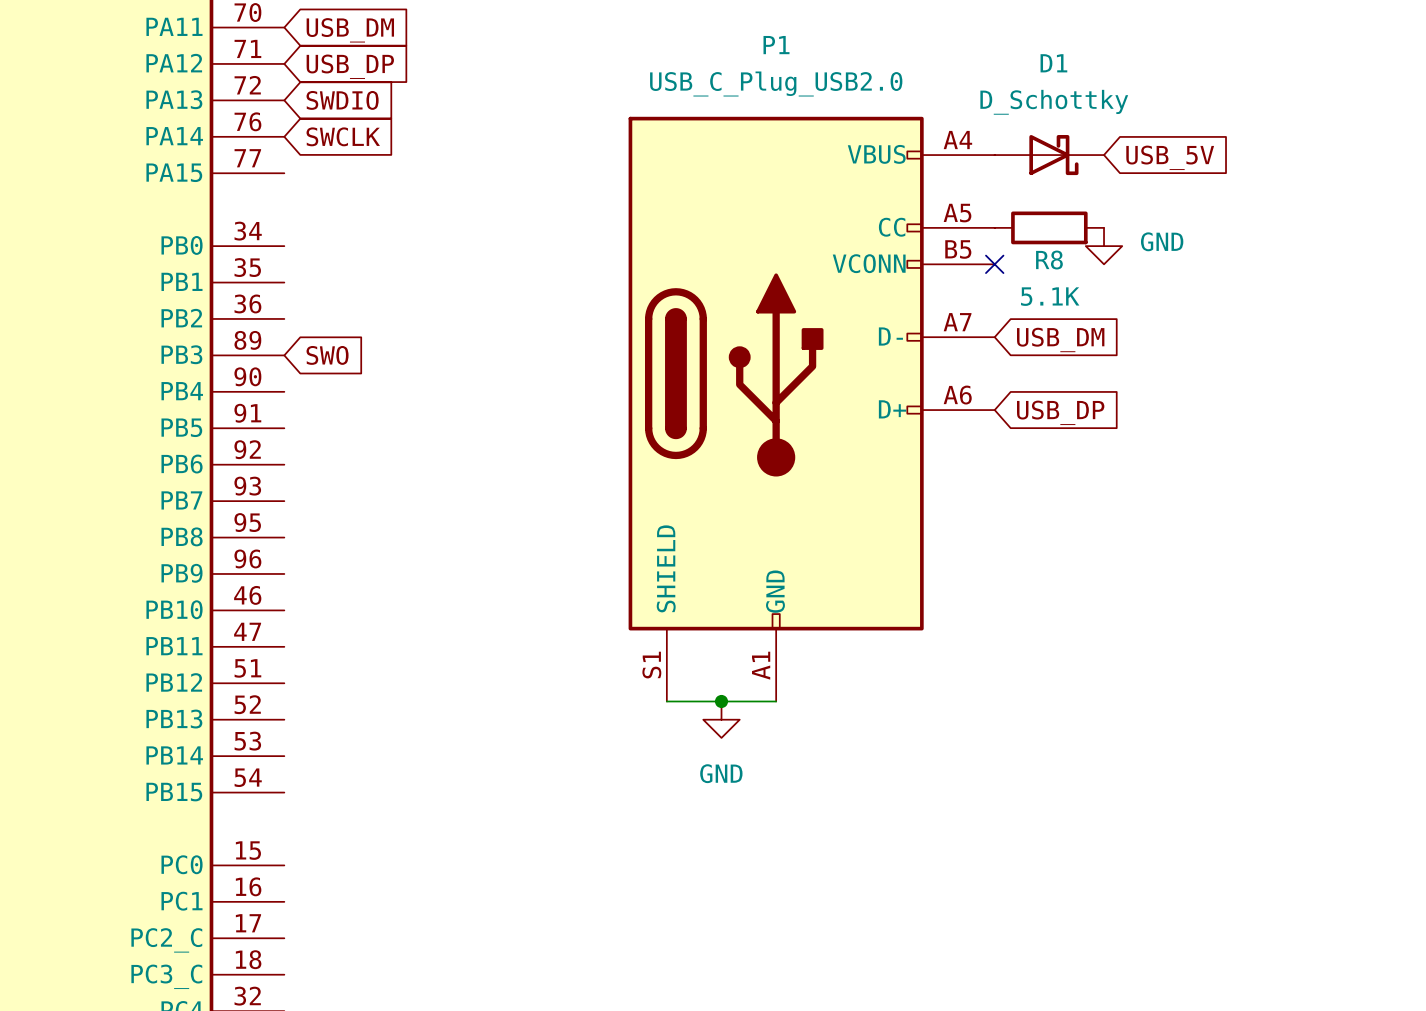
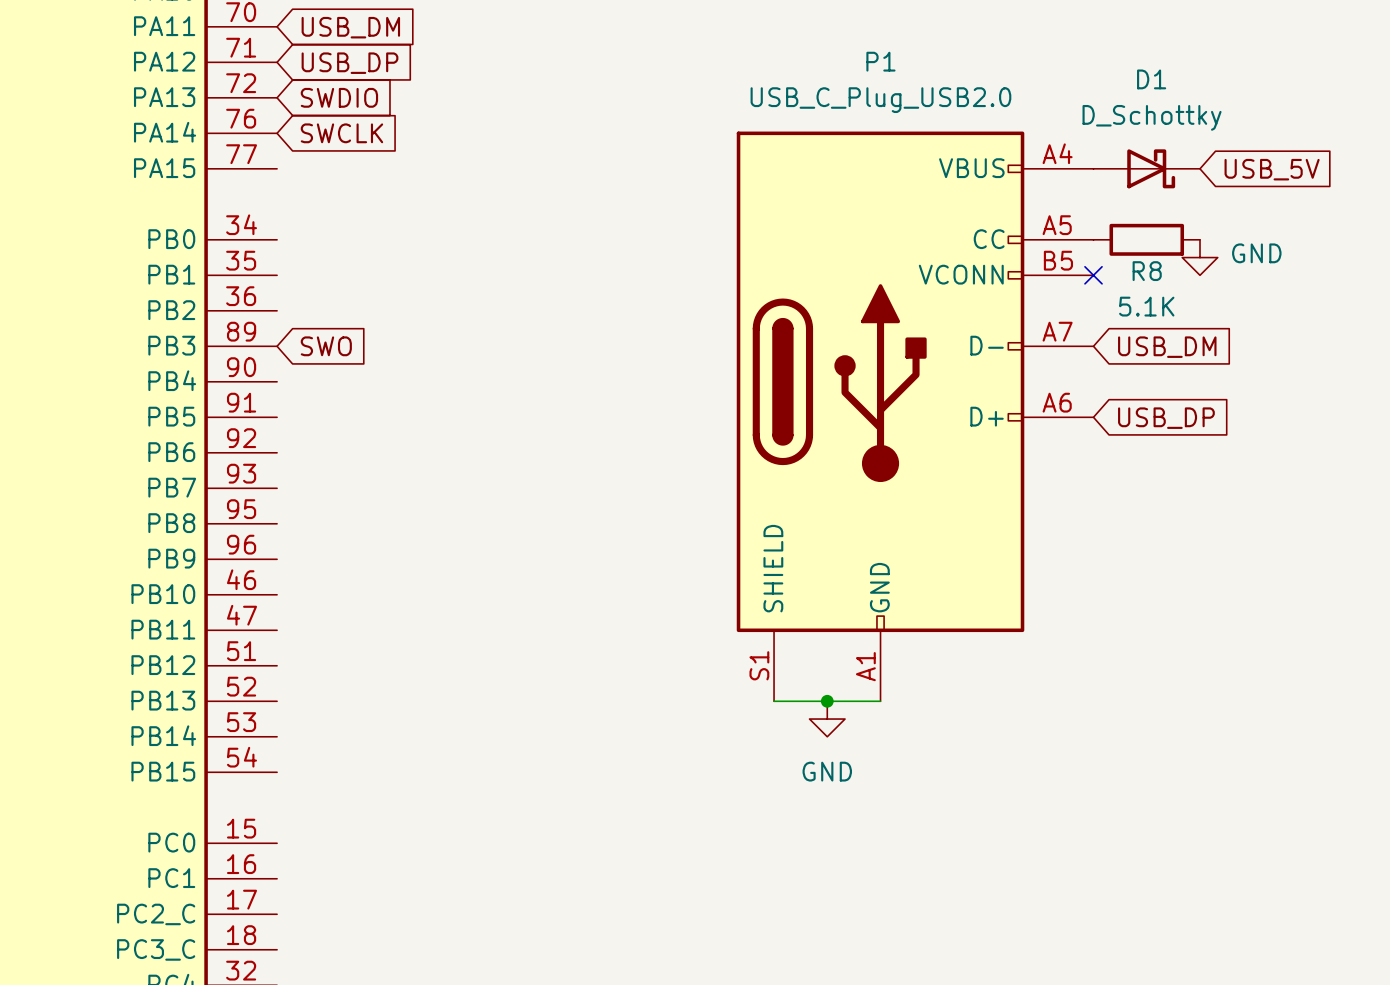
D1 position: (1049, 155) -> (1146, 168)
global label position: USB_5V (1170, 157) -> USB_5V (1272, 169)
R8 position: (1049, 227) -> (1146, 239)
power symbol position: GND (1104, 246) -> GND (1200, 257)
no-connect mark: (994, 264) -> none
no-connect mark: none -> (1093, 275)
global label position: USB_DM (1060, 339) -> USB_DM (1167, 347)
P1 position: (811, 409) -> (915, 416)
global label position: USB_DP (1060, 412) -> USB_DP (1166, 418)
wire: (666, 701) (776, 701) -> (774, 701) (880, 701)
junction: (721, 701) -> none
power symbol position: GND (721, 719) -> GND (827, 719)
junction: none -> (827, 701)

